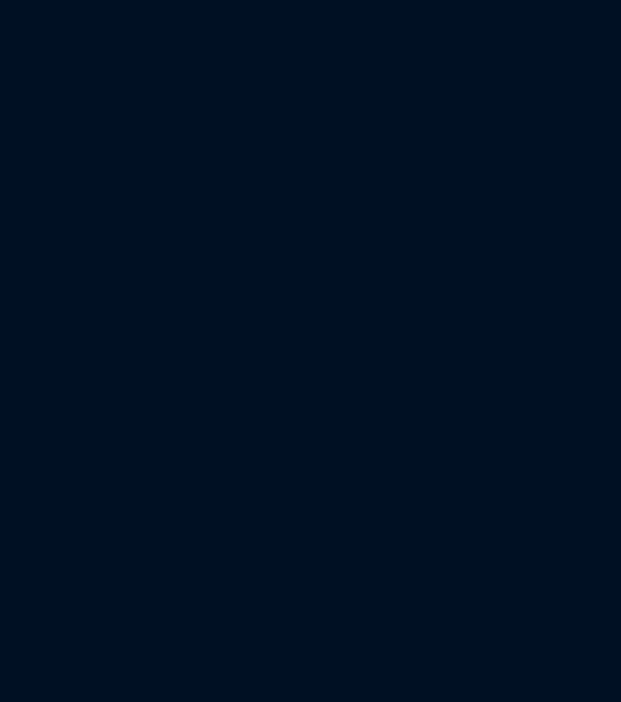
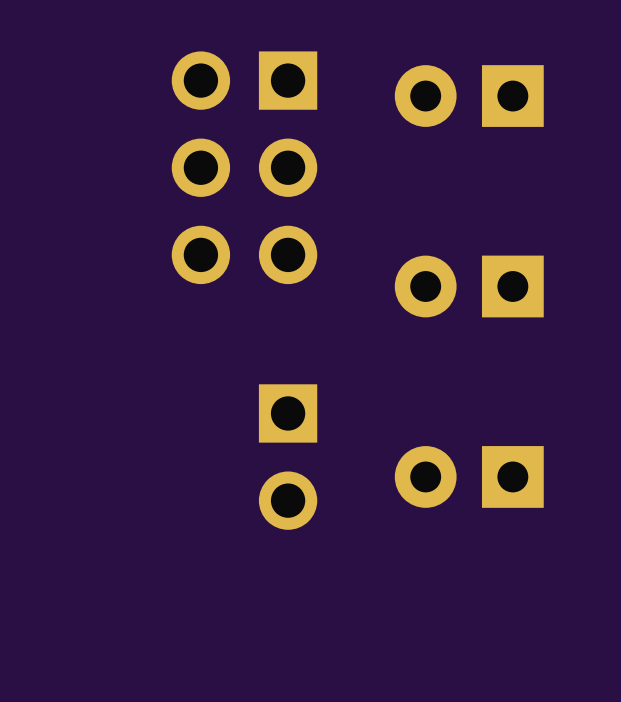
part: none -> (469, 96)
part: none -> (244, 167)
part: none -> (469, 286)
part: none -> (288, 457)
part: none -> (469, 476)

